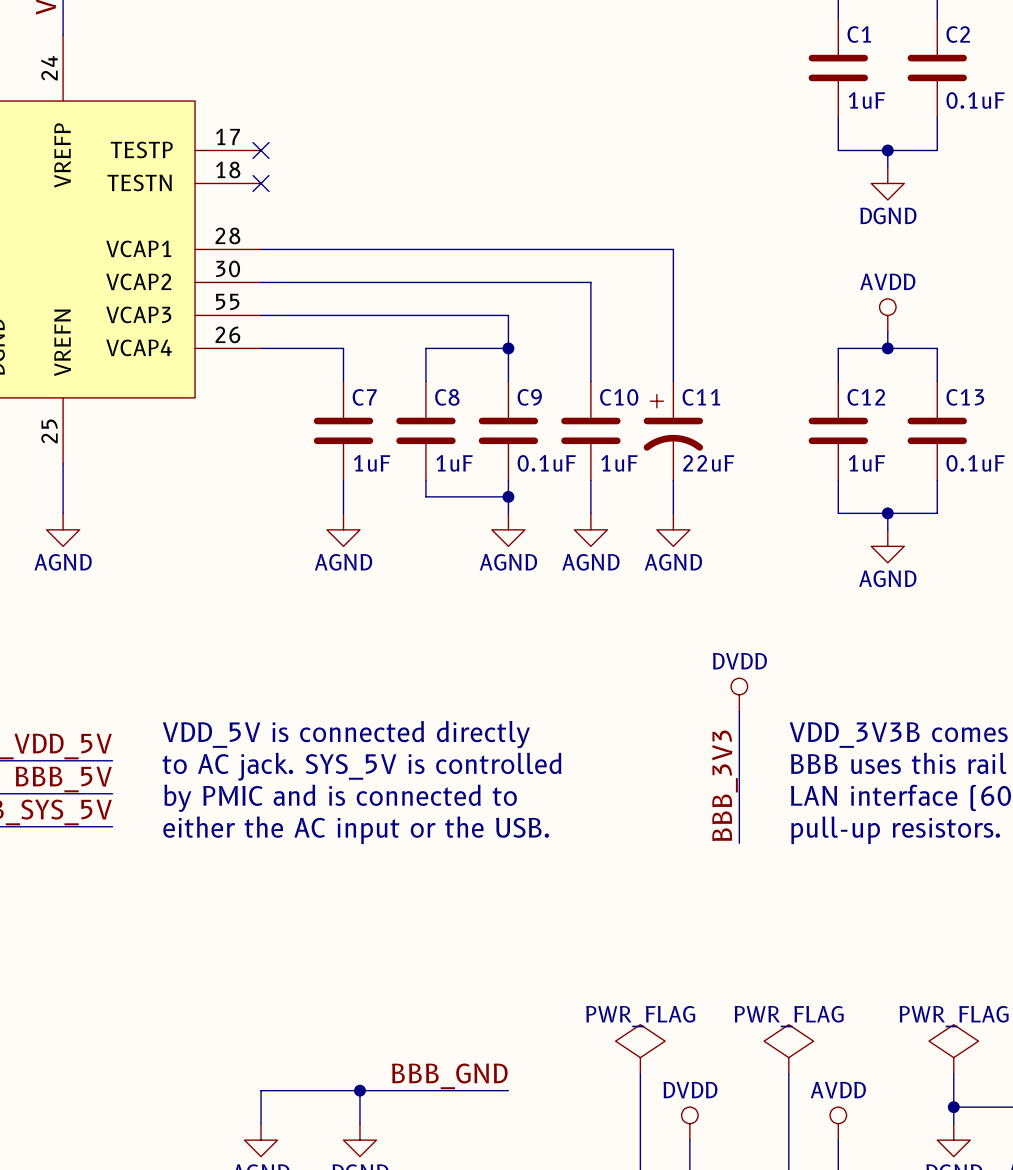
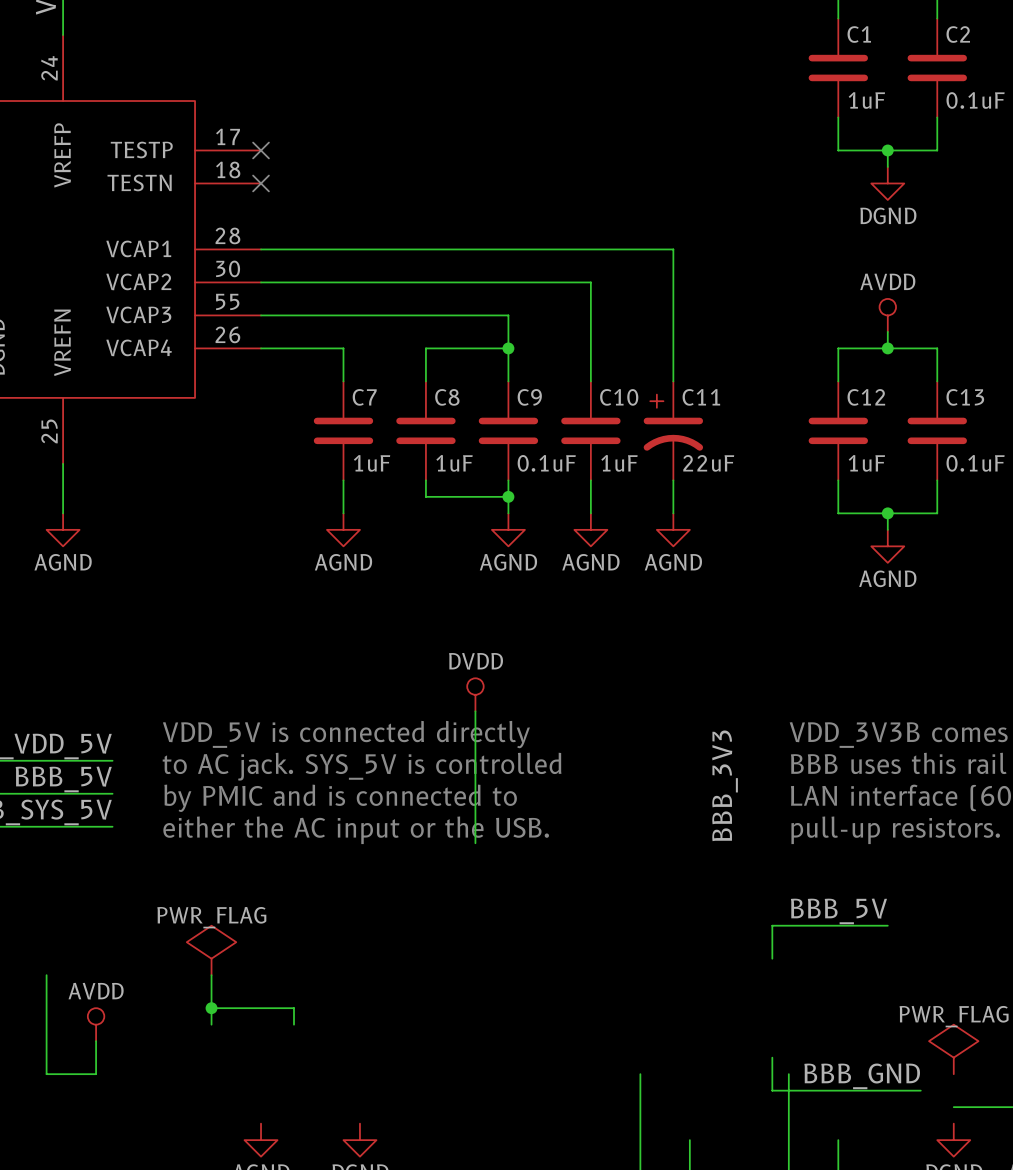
power symbol: none -> DVDD (475, 694)
power symbol: DVDD (739, 694) -> none
wire: (739, 711) (739, 843) -> (475, 711) (475, 843)
label: none -> BBB_5V (838, 911)
wire: none -> (887, 925) (772, 925) (772, 958)
power symbol: none -> PWR_FLAG (211, 950)
wire: none -> (46, 975) (46, 1074) (96, 1074) (96, 1041)
wire: none -> (211, 975) (211, 1024)
wire: none -> (211, 1008) (294, 1008) (294, 1024)
junction: none -> (211, 1008)
power symbol: none -> AVDD (96, 1024)
power symbol: PWR_FLAG (640, 1049) -> none
power symbol: PWR_FLAG (788, 1049) -> none
wire: none -> (772, 1057) (772, 1090) (920, 1090)
wire: (953, 1074) (953, 1123) -> none
label: BBB_GND (449, 1076) -> none
label: none -> BBB_GND (862, 1076)
wire: (359, 1090) (359, 1123) -> none
junction: (359, 1090) -> none
wire: (508, 1090) (261, 1090) (261, 1123) -> none
junction: (953, 1107) -> none
power symbol: DVDD (689, 1123) -> none
power symbol: AVDD (838, 1123) -> none

